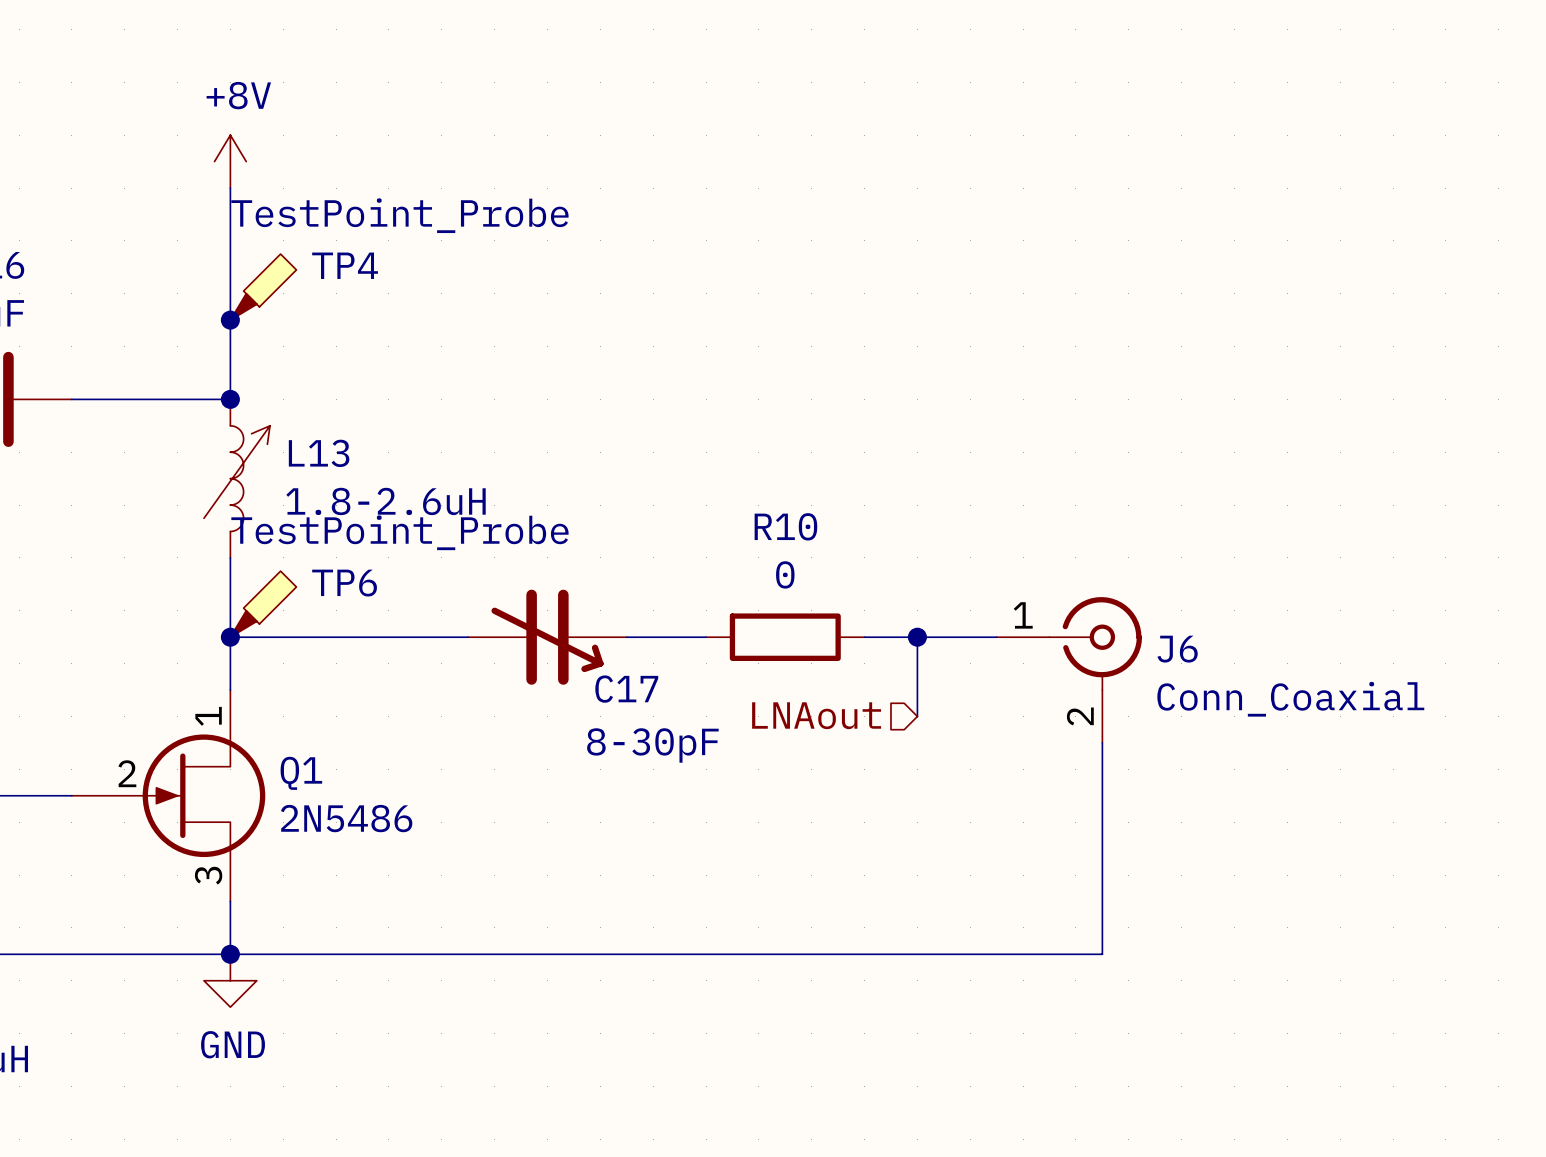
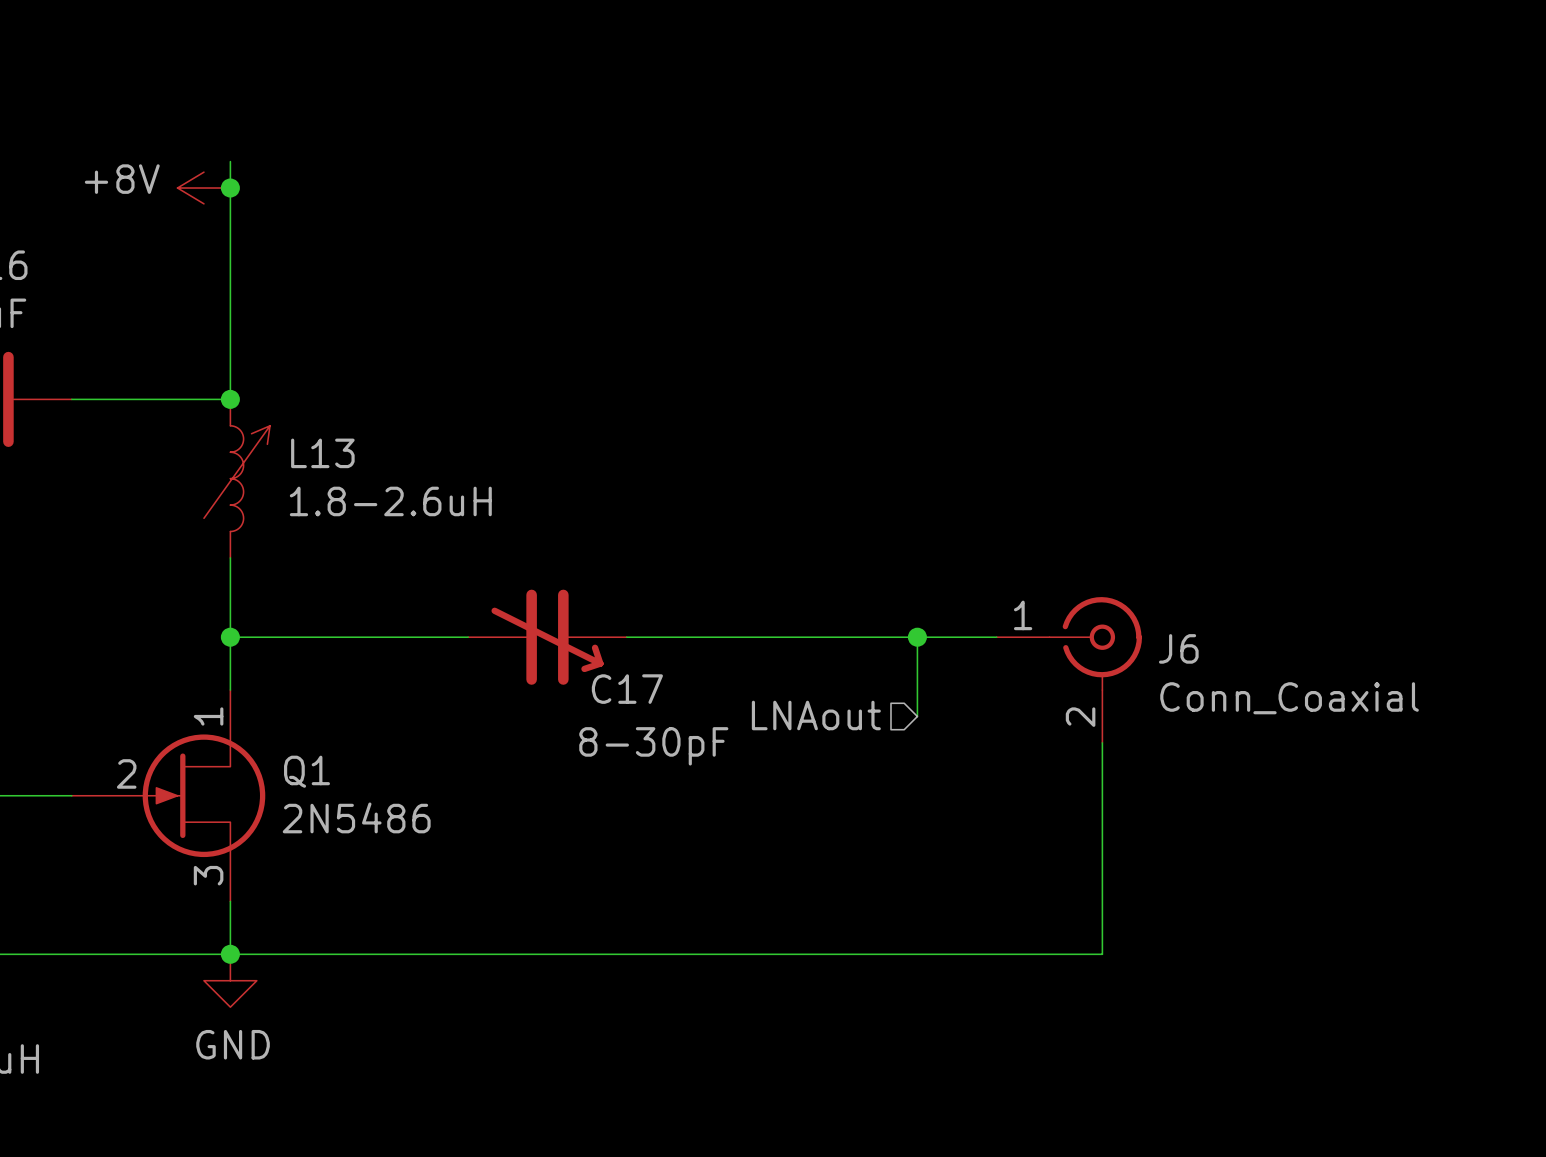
power symbol rotation: 0° (230, 161) -> 90° counterclockwise (203, 188)
power symbol position: +8V (230, 161) -> +8V (203, 188)
junction: none -> (230, 188)
TP4: TestPoint_Probe (263, 287) -> none
junction: (230, 320) -> none
TP6: TestPoint_Probe (263, 604) -> none
wire: none -> (706, 637) (864, 637)
R10: 0 (785, 637) -> none

